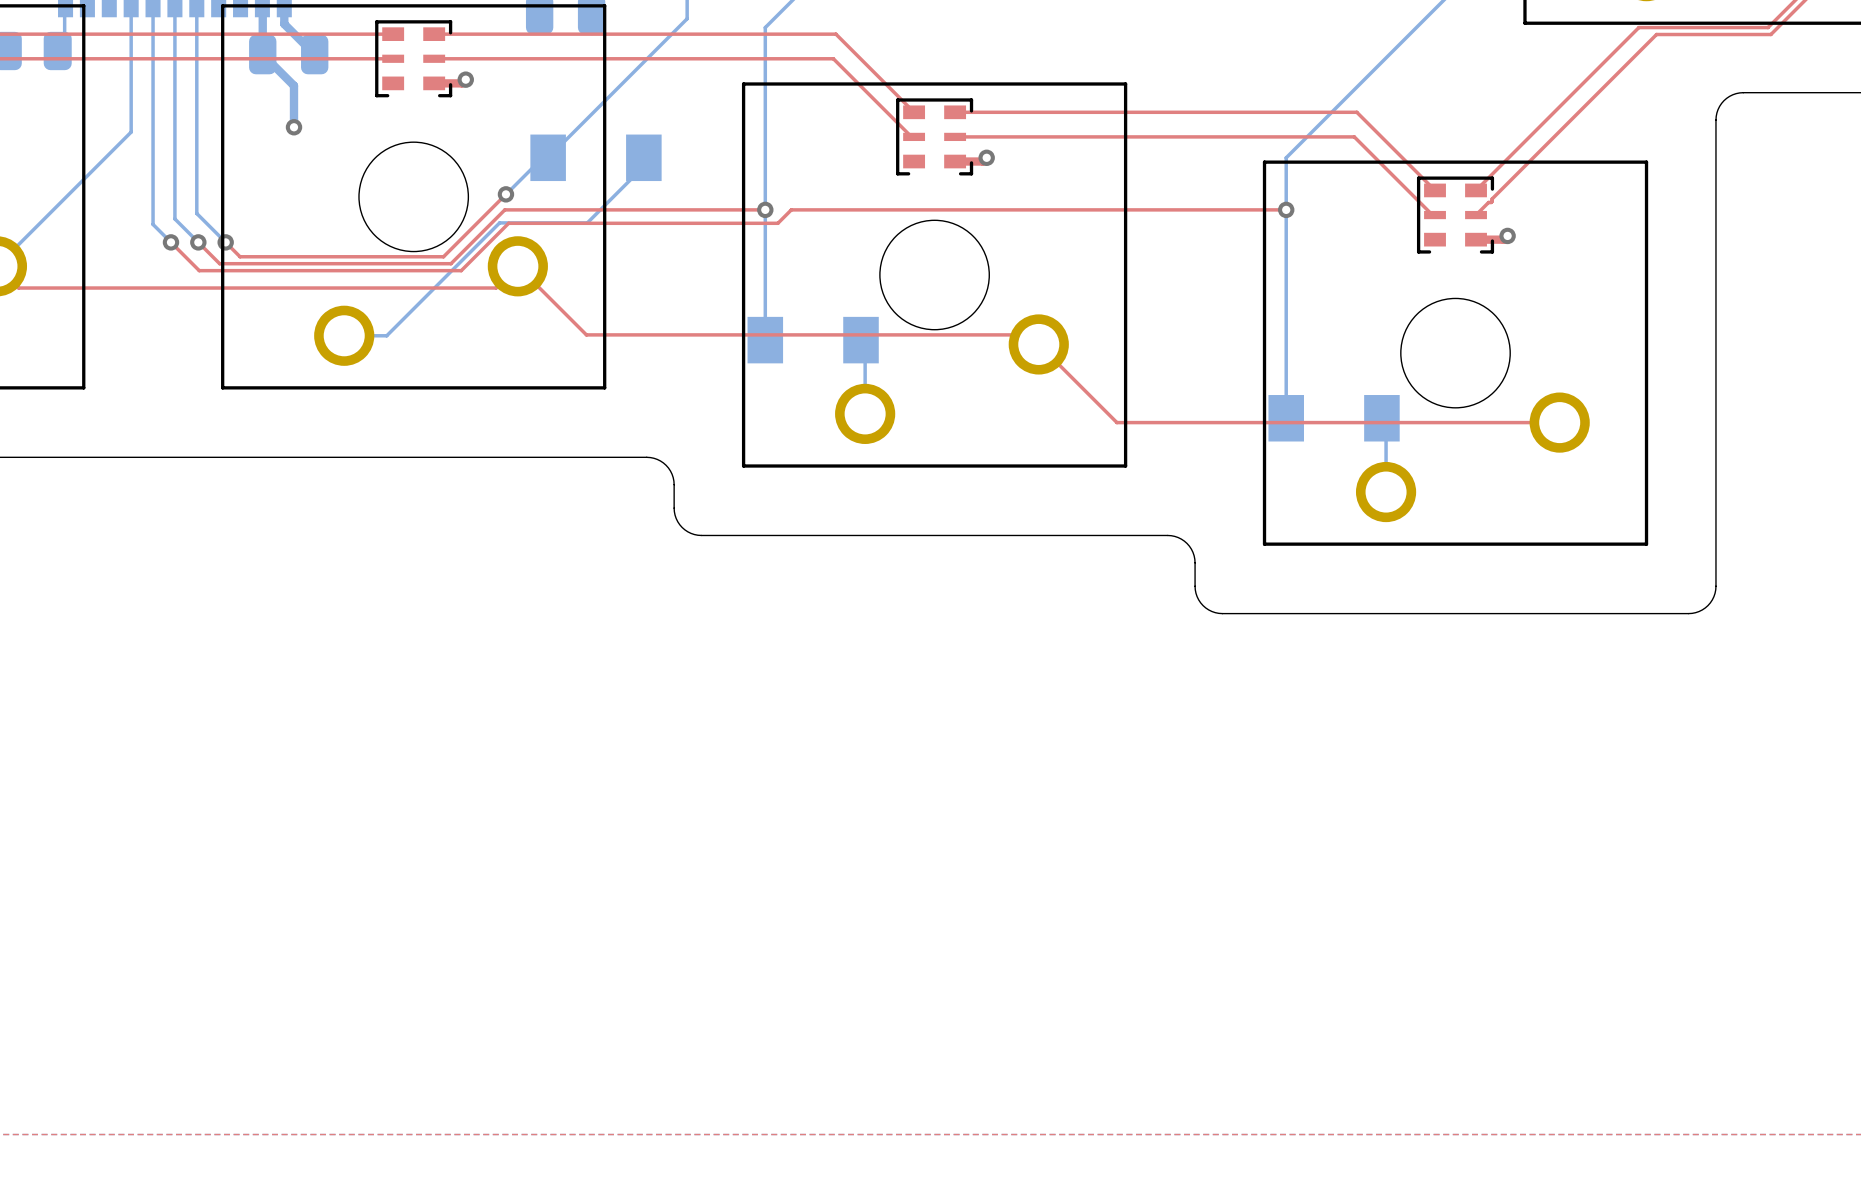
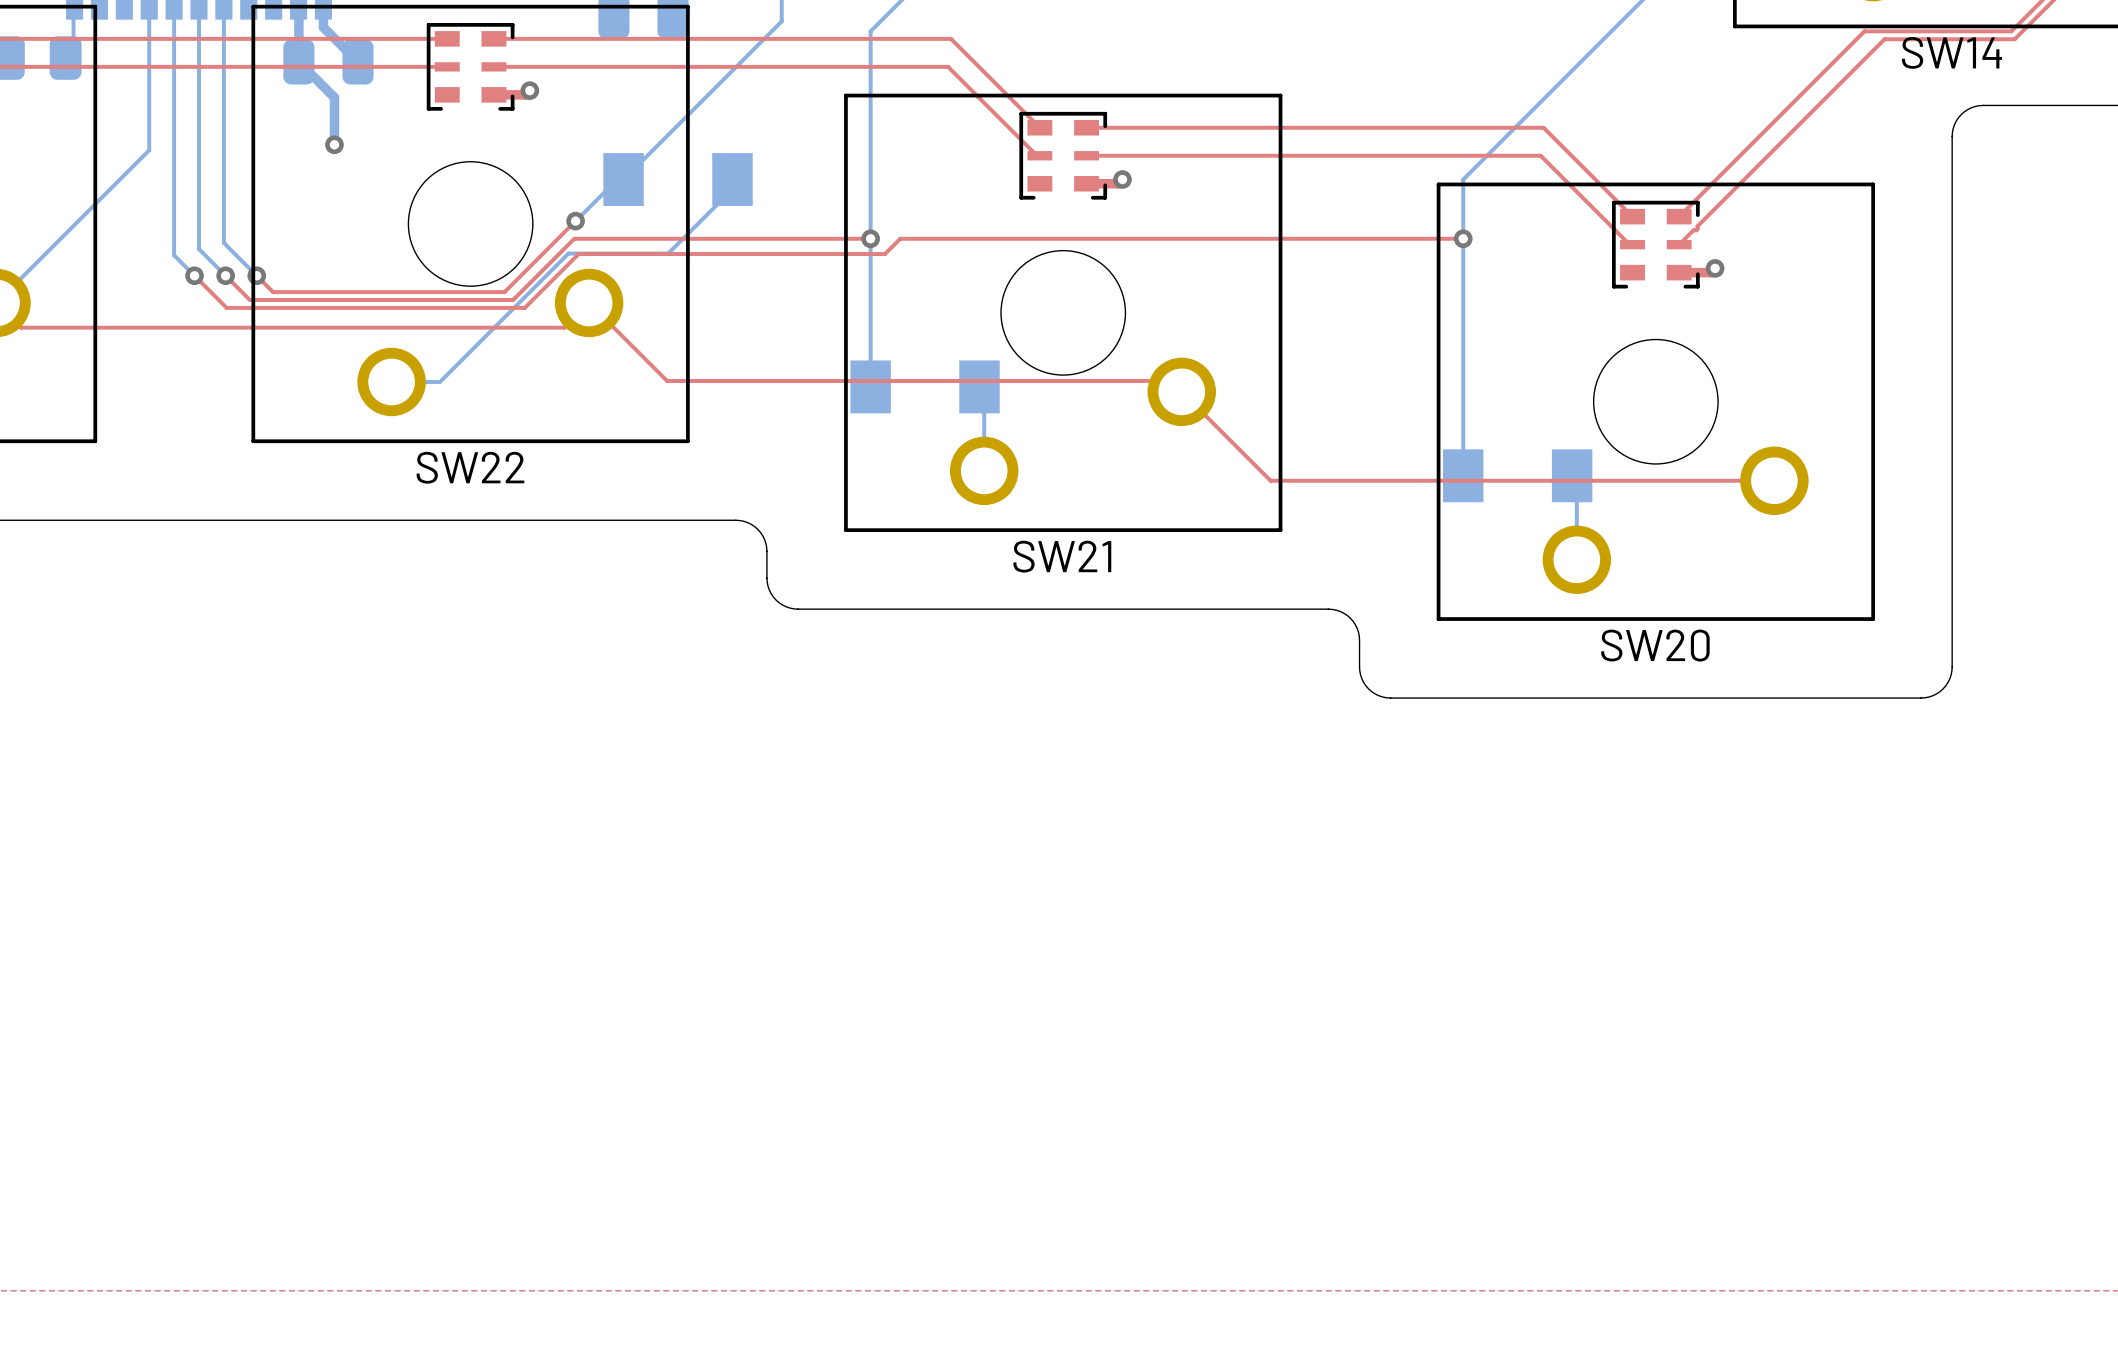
SW14 name: none -> SW14 (1951, 52)
SW22 name: none -> SW22 (470, 467)
SW21 name: none -> SW21 (1062, 556)
SW20 name: none -> SW20 (1655, 645)

